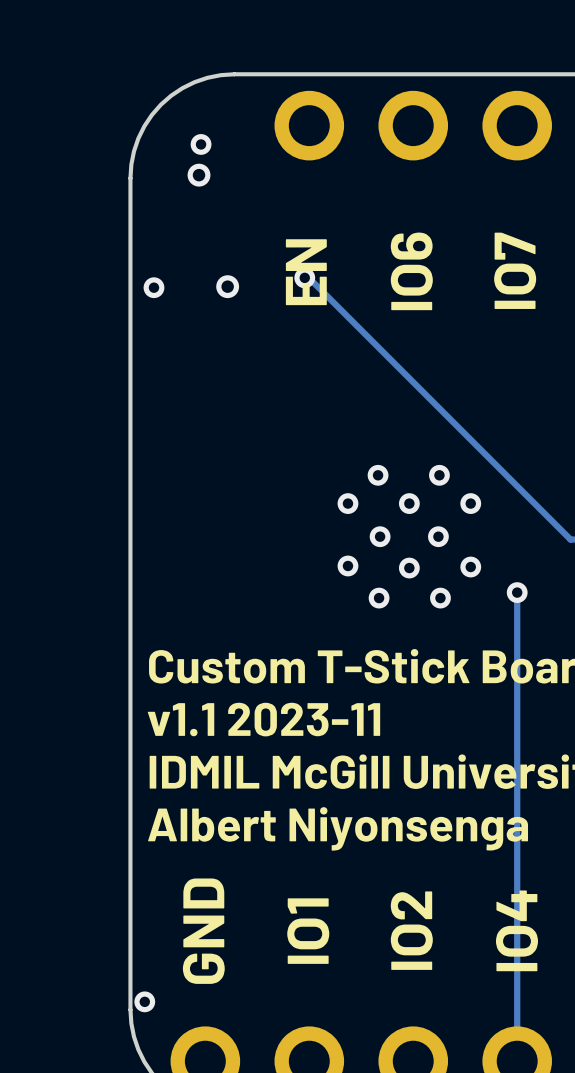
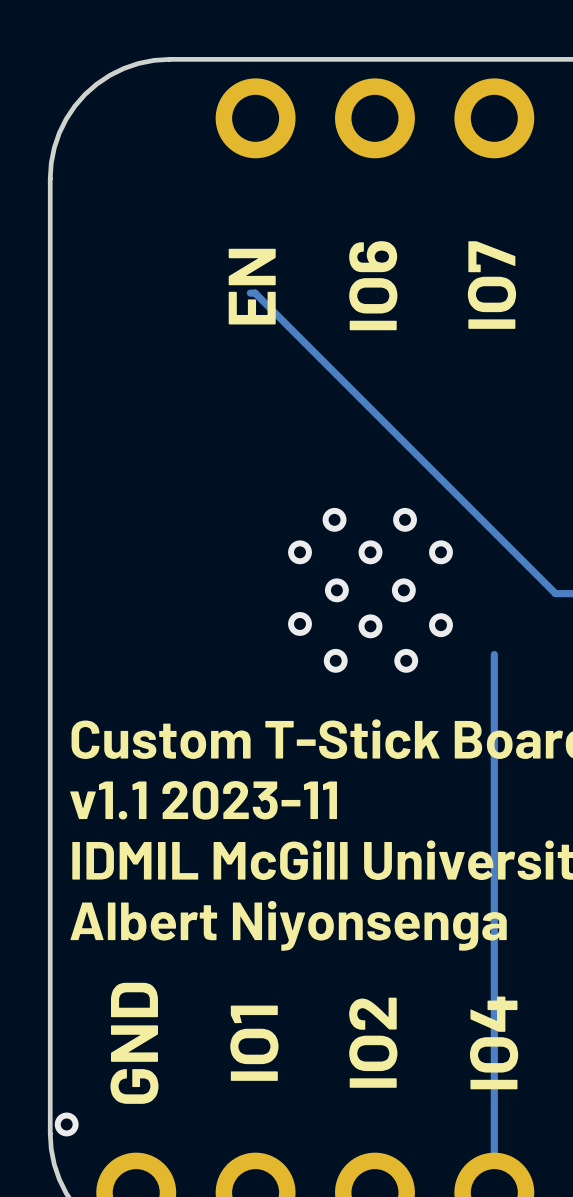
via: (201, 144) -> none
via: (199, 175) -> none
via: (304, 277) -> none
via: (227, 286) -> none
via: (153, 287) -> none
via: (517, 592) -> none

